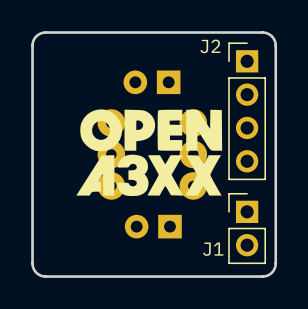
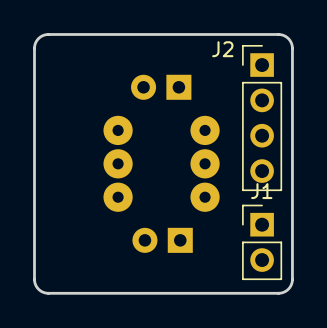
drawing: [76, 109, 223, 197] -> none
J1 name position: J1 (213, 249) -> J1 (261, 191)

